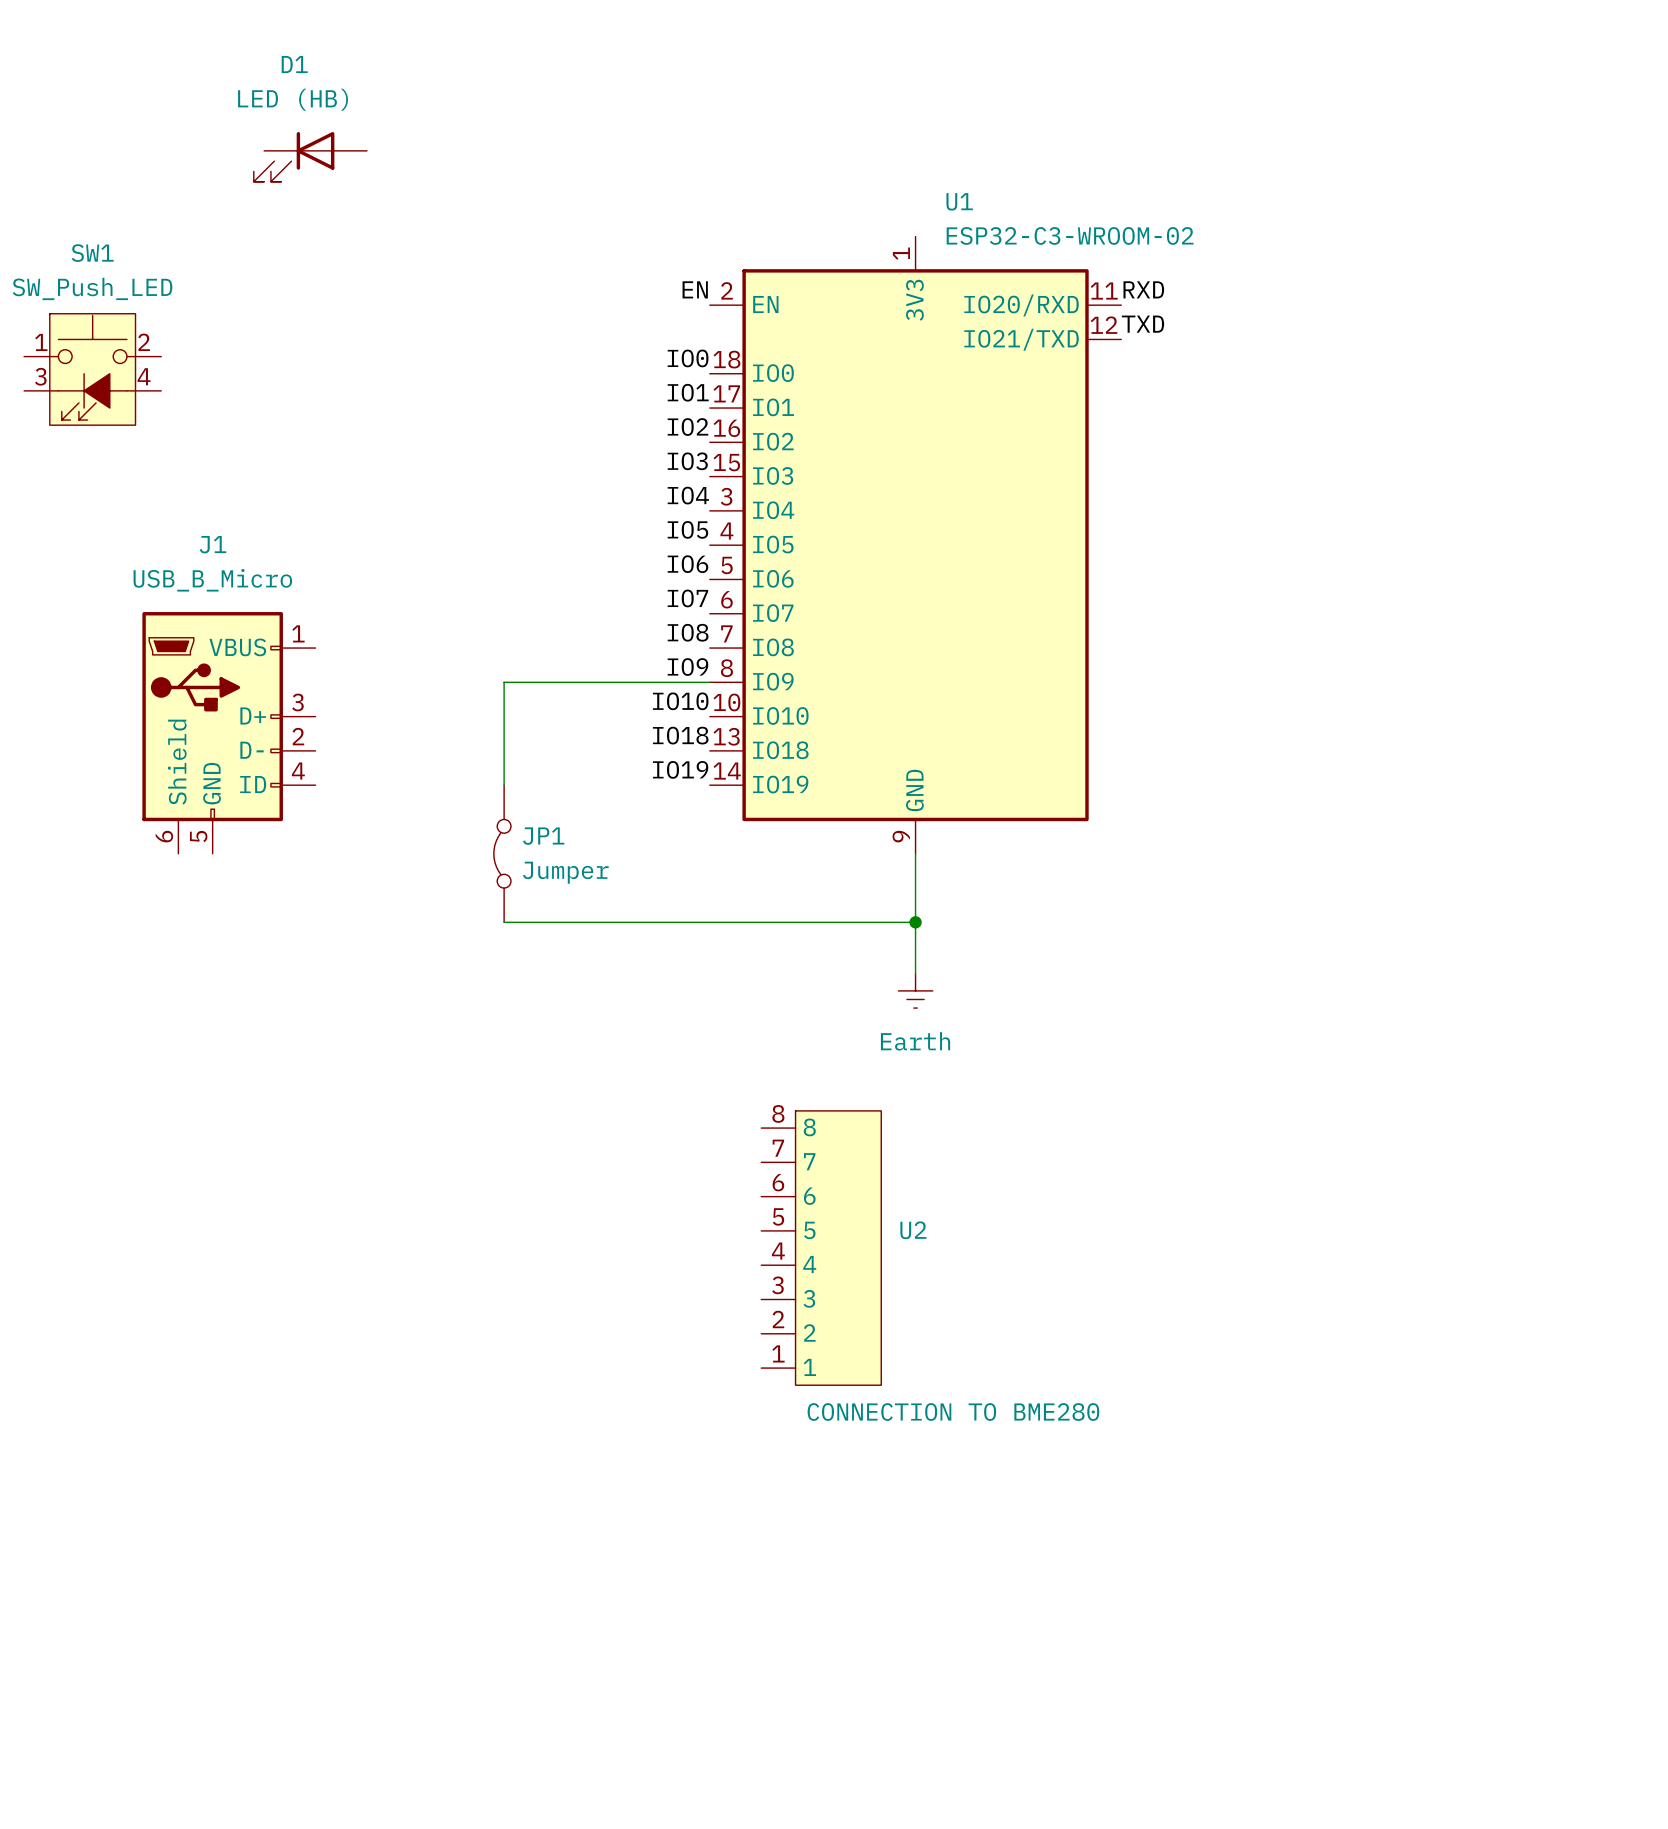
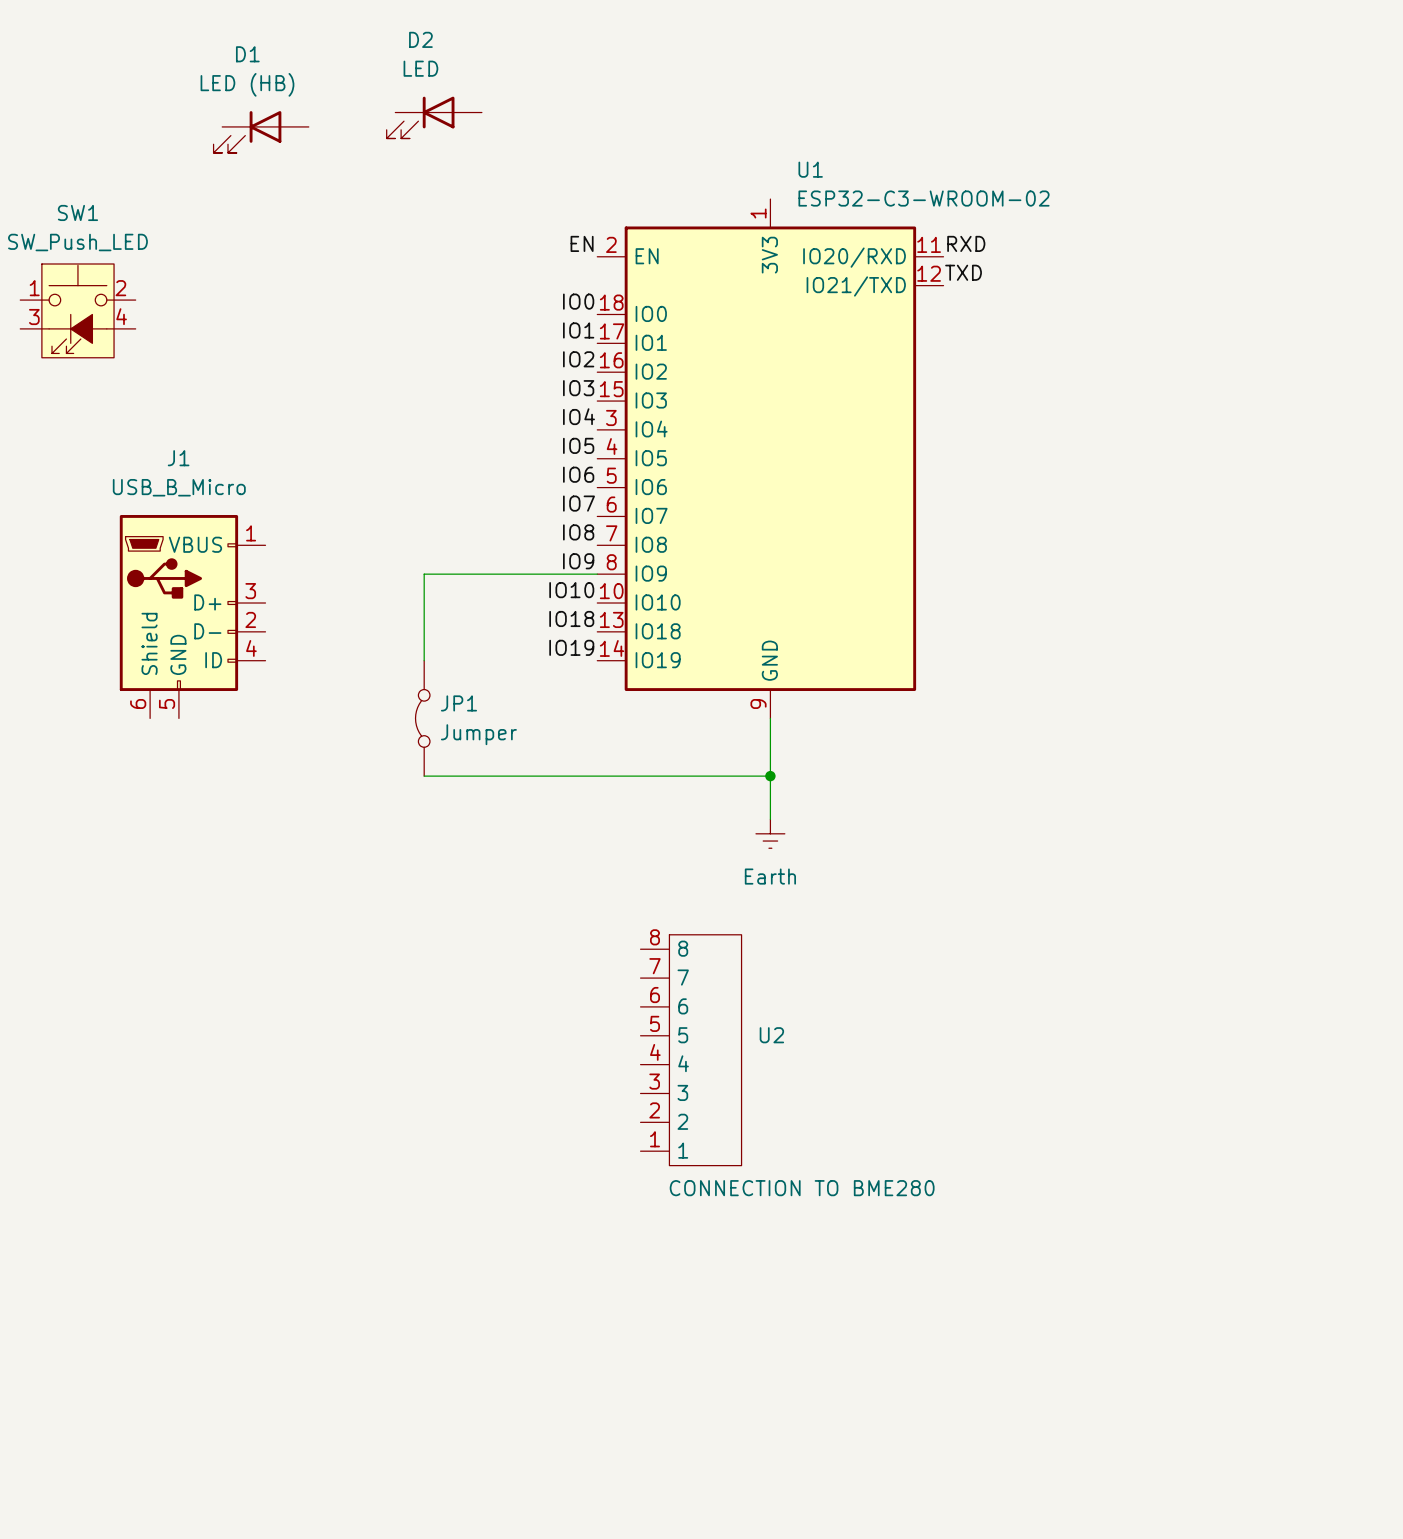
D2: none -> LED (434, 117)
U2 symbol: [761, 1110, 882, 1386] -> [640, 934, 742, 1166]

